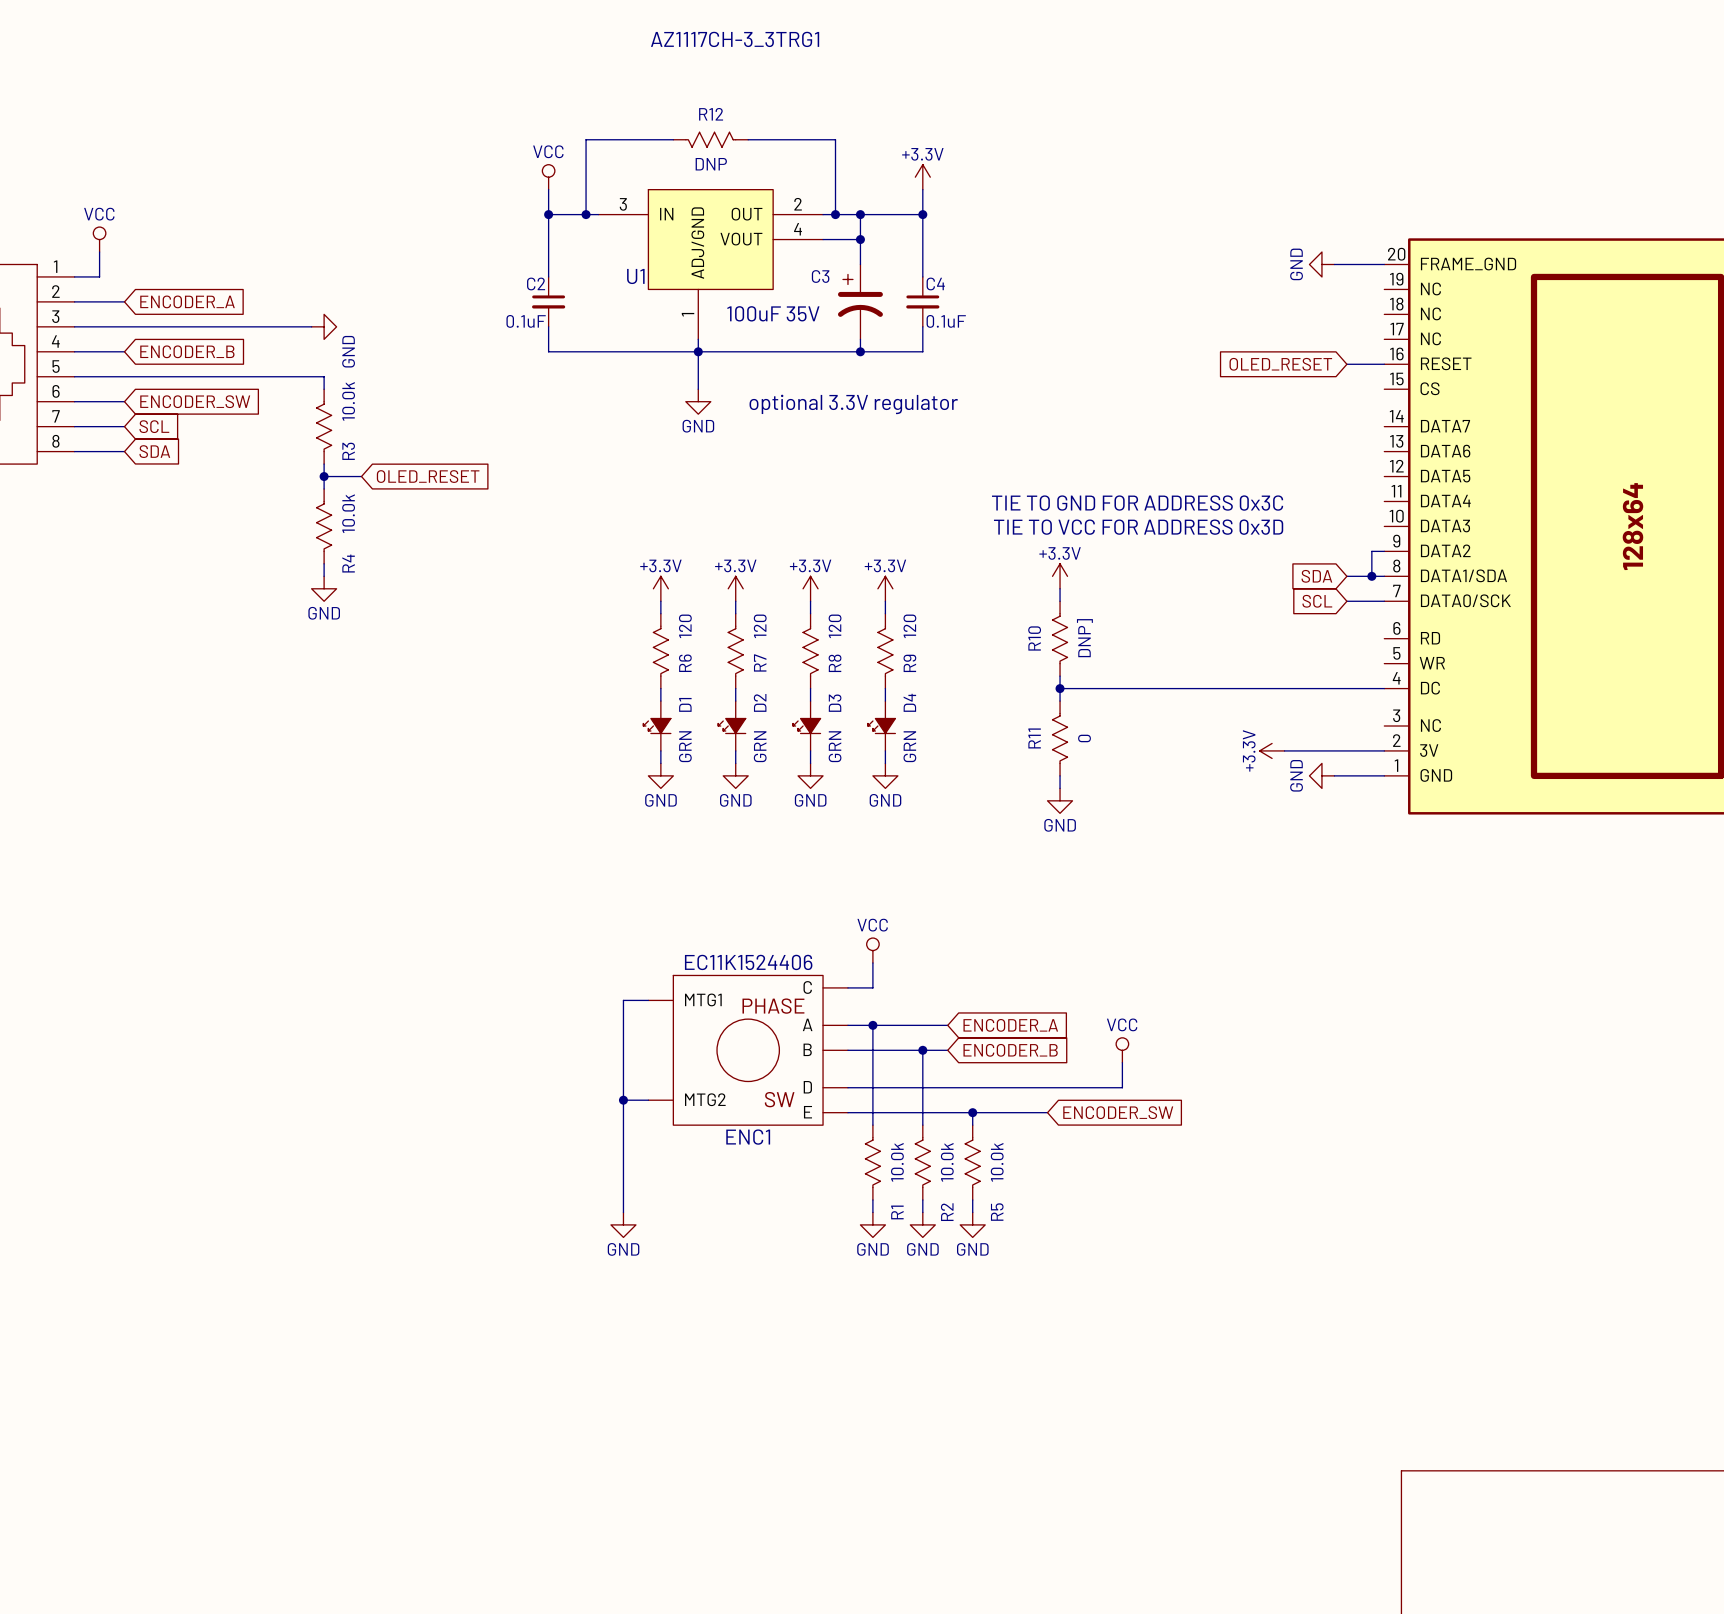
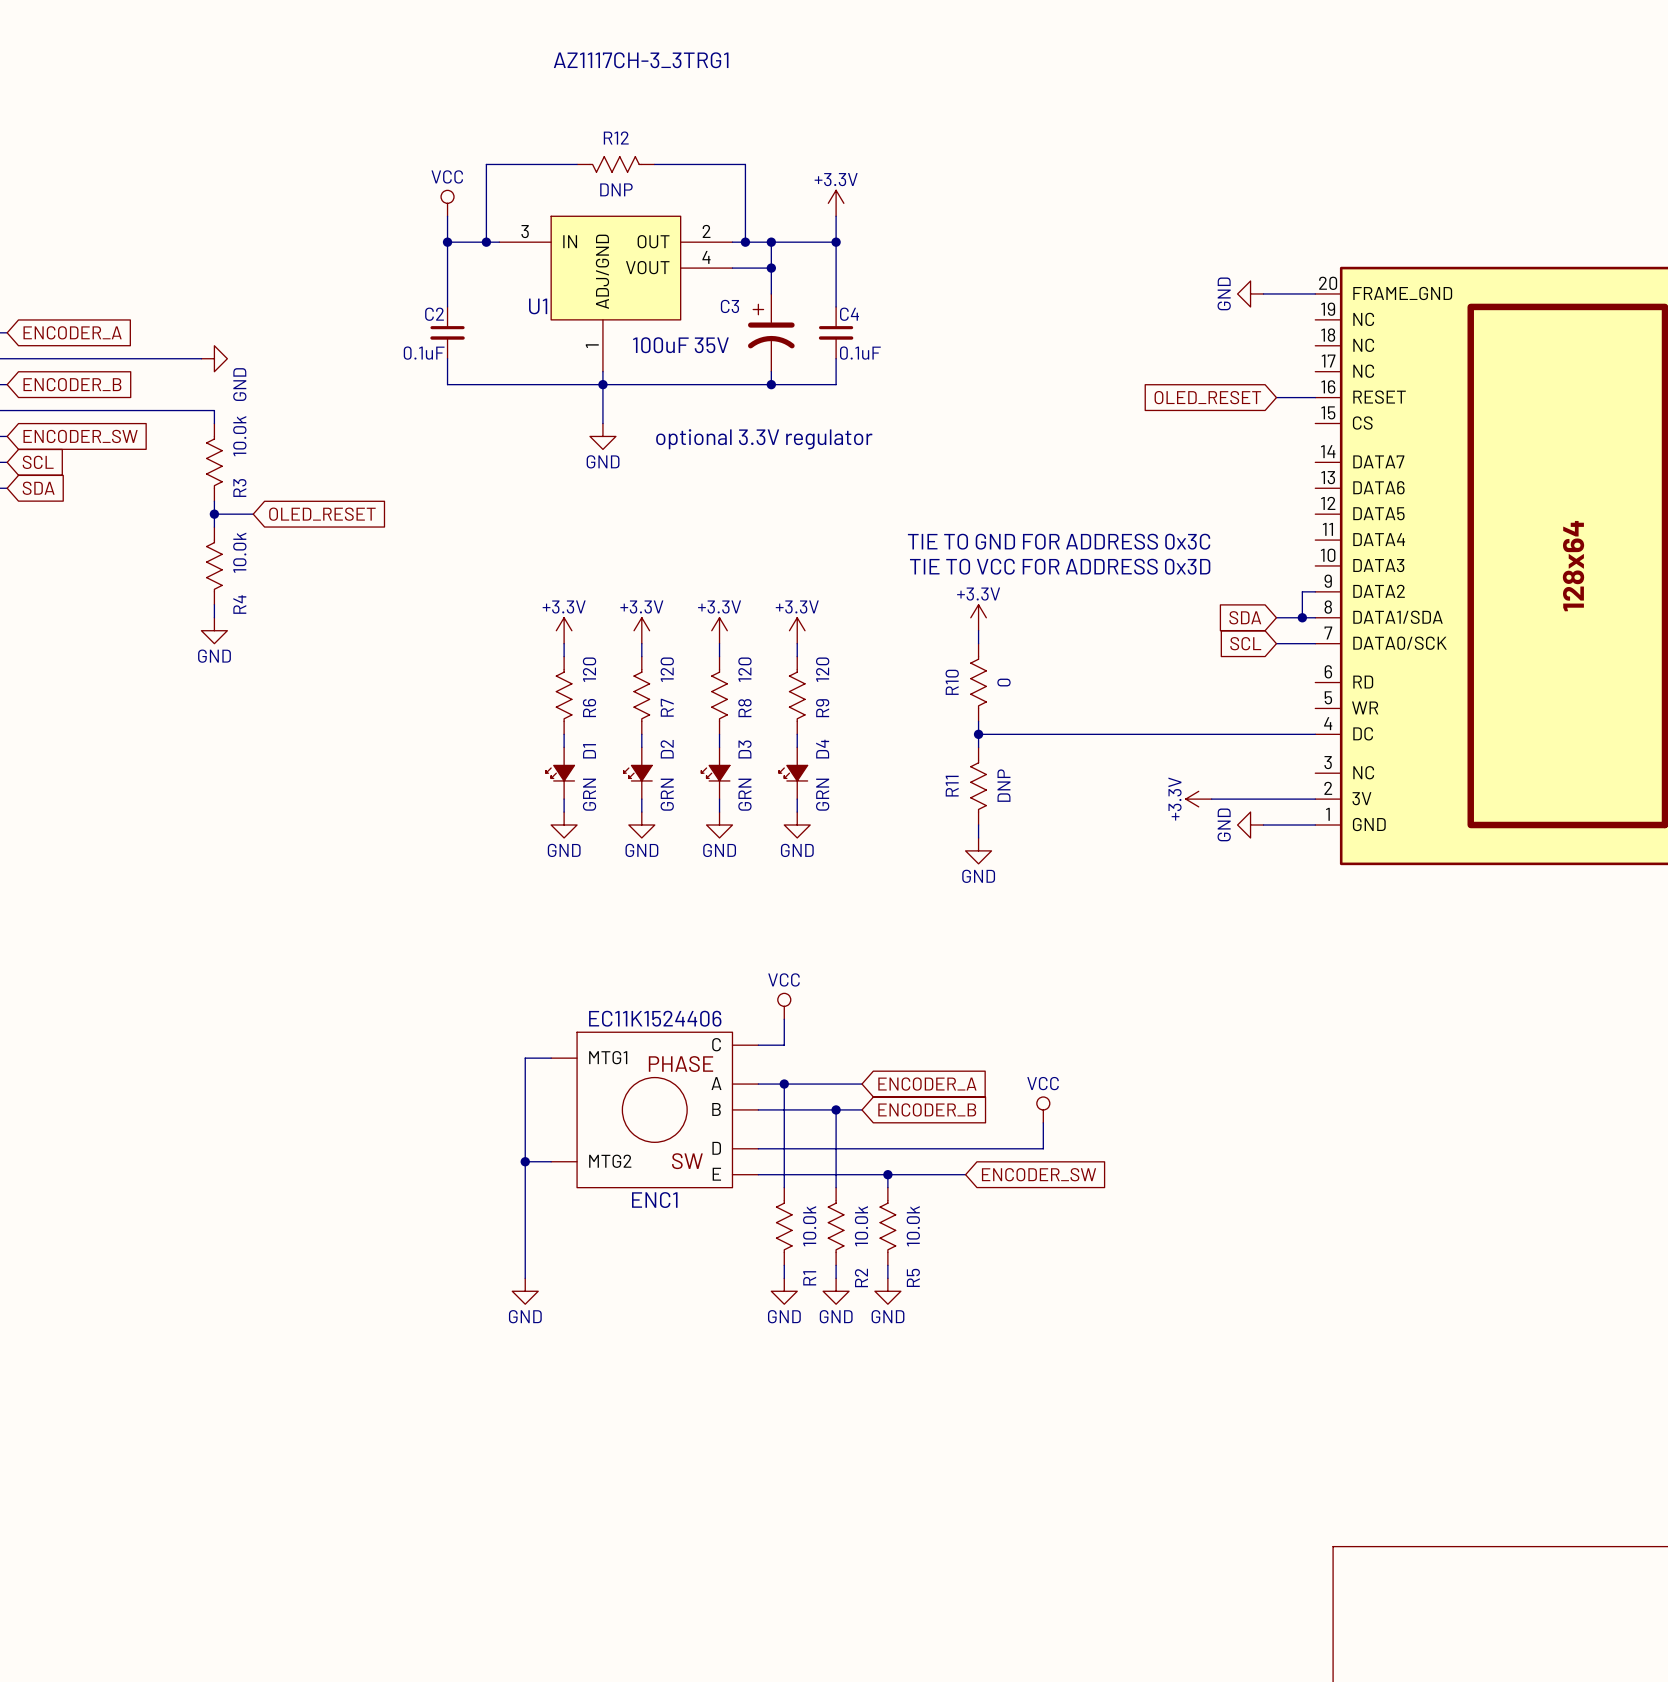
R10 value: DNP] (1084, 638) -> 0 (1003, 682)
R11 value: 0 (1084, 738) -> DNP (1003, 785)

